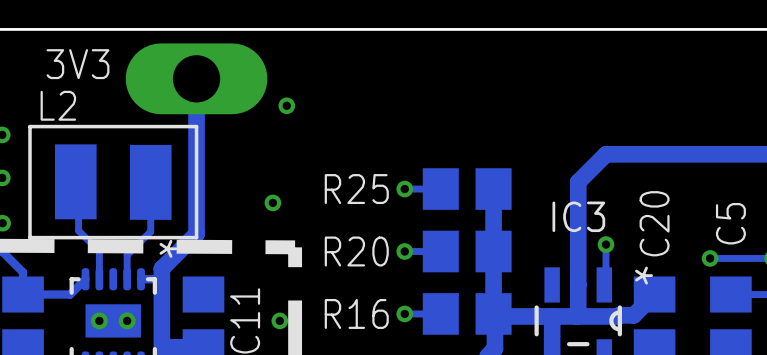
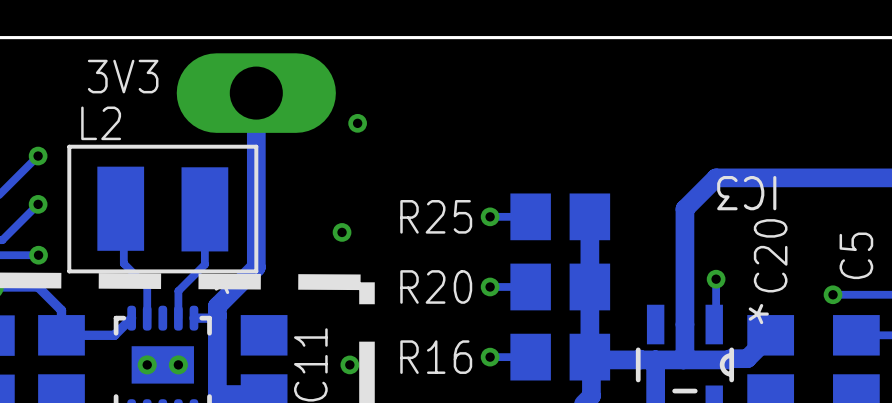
IC3 name rotation: 0° (578, 216) -> 180° (746, 193)

